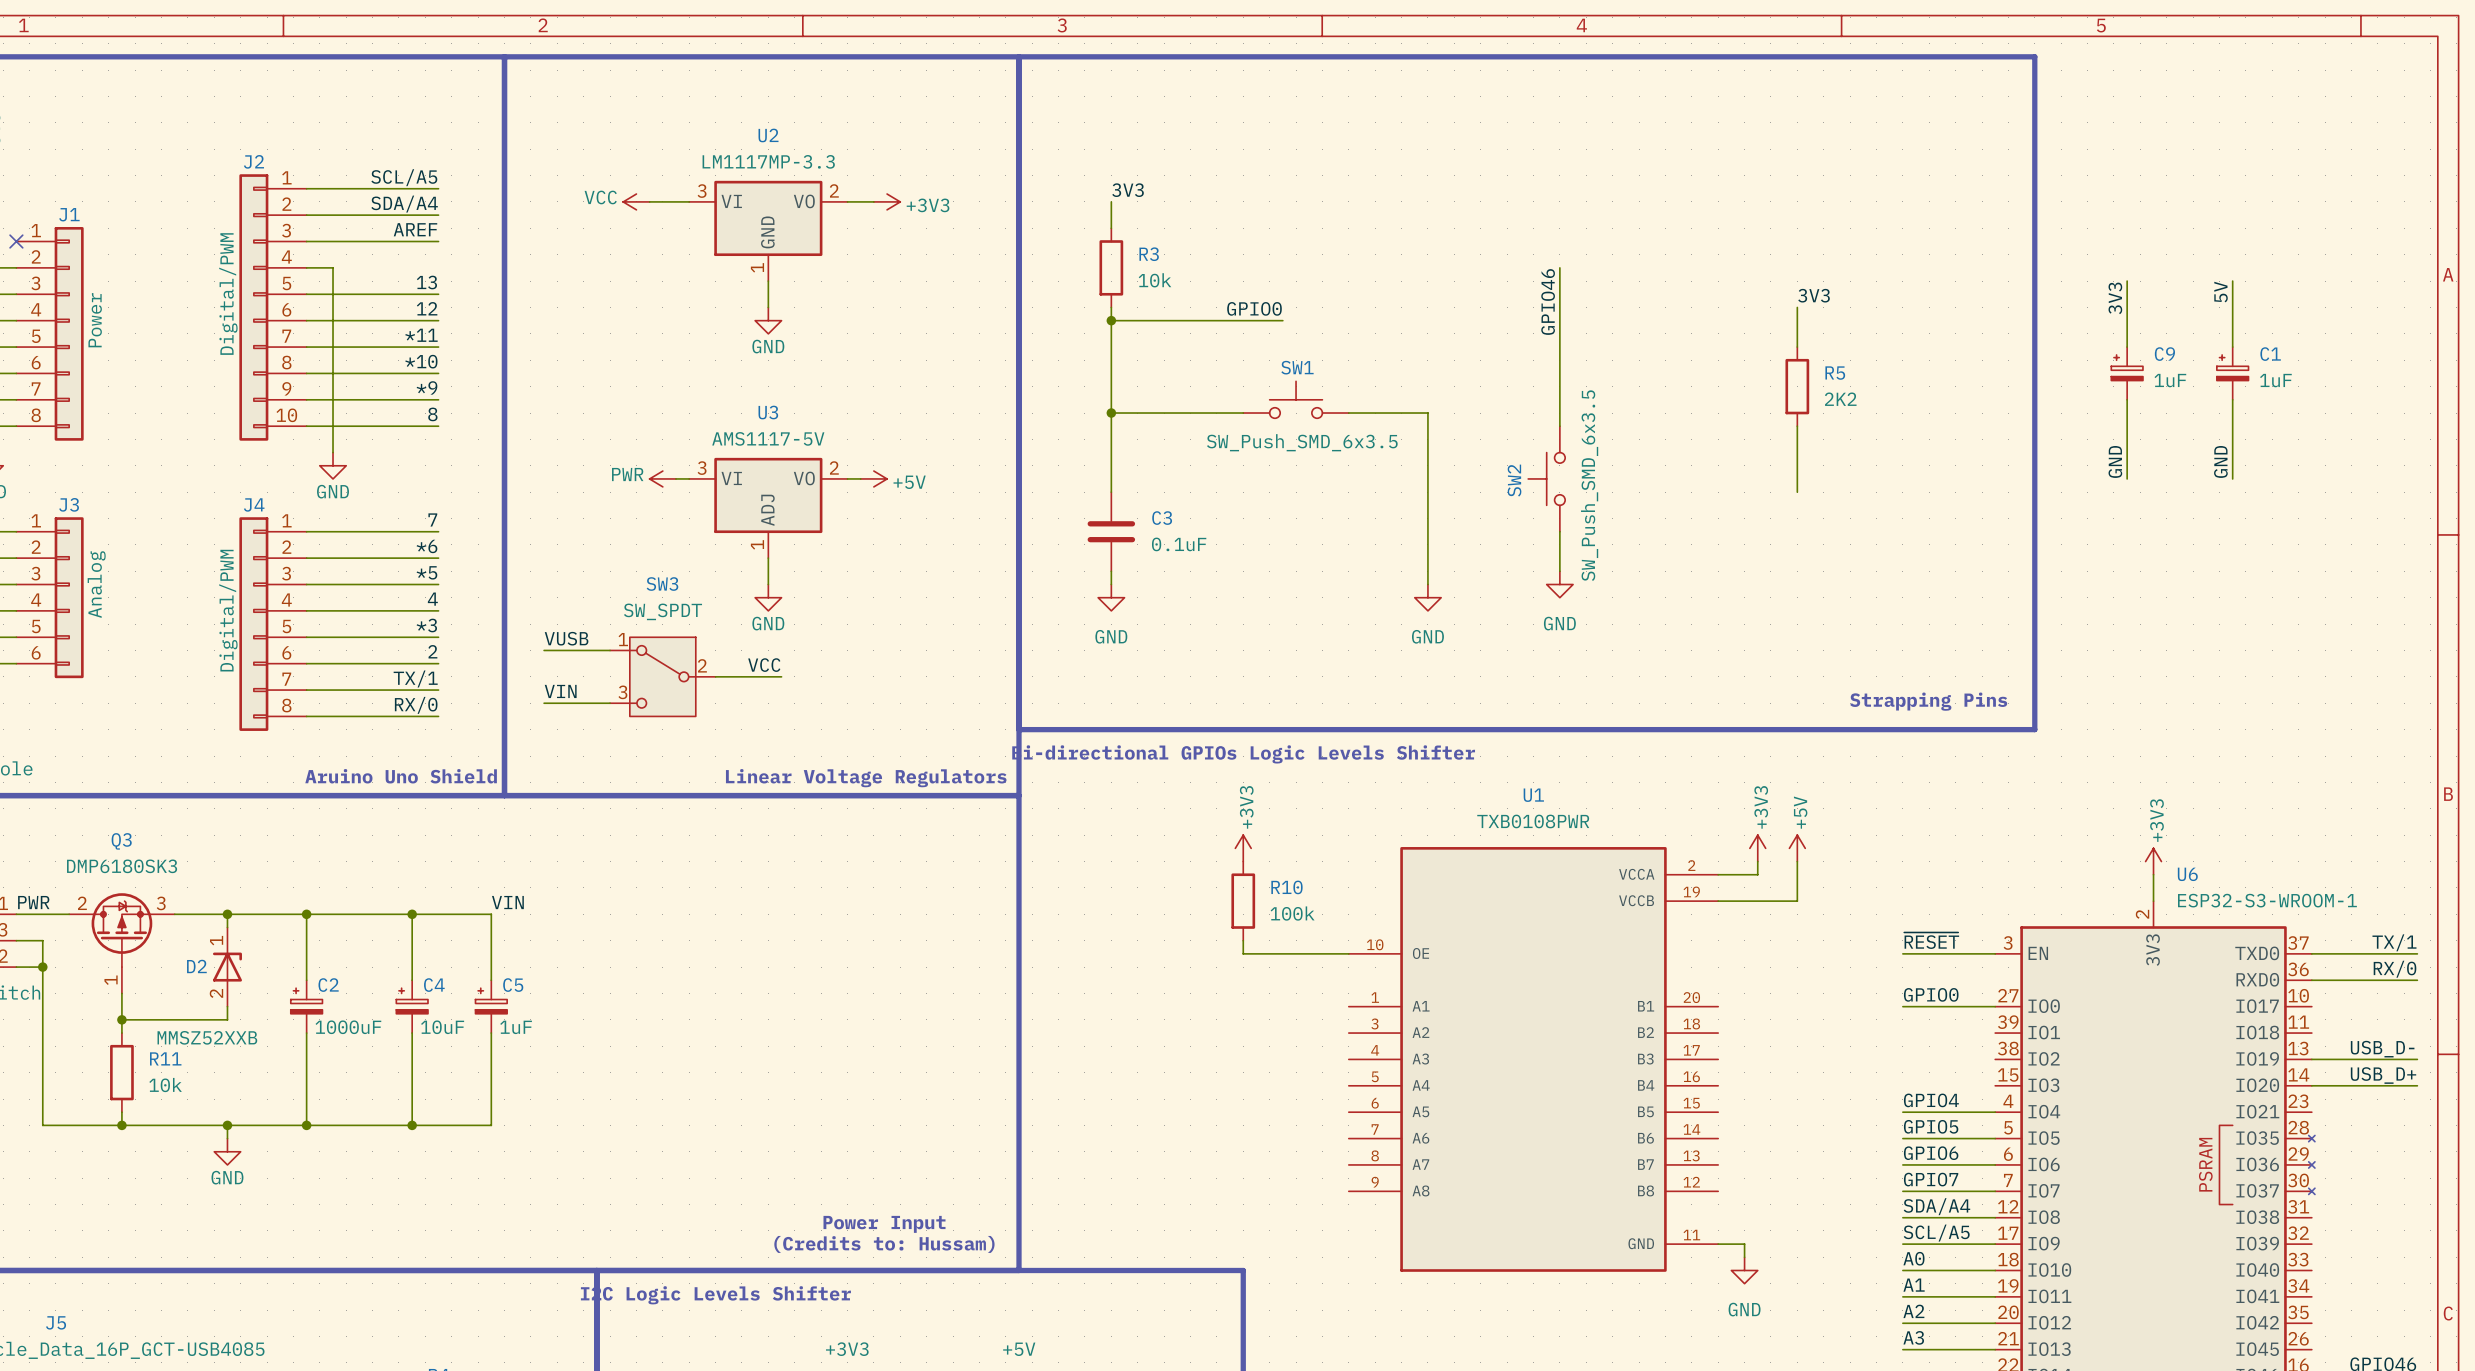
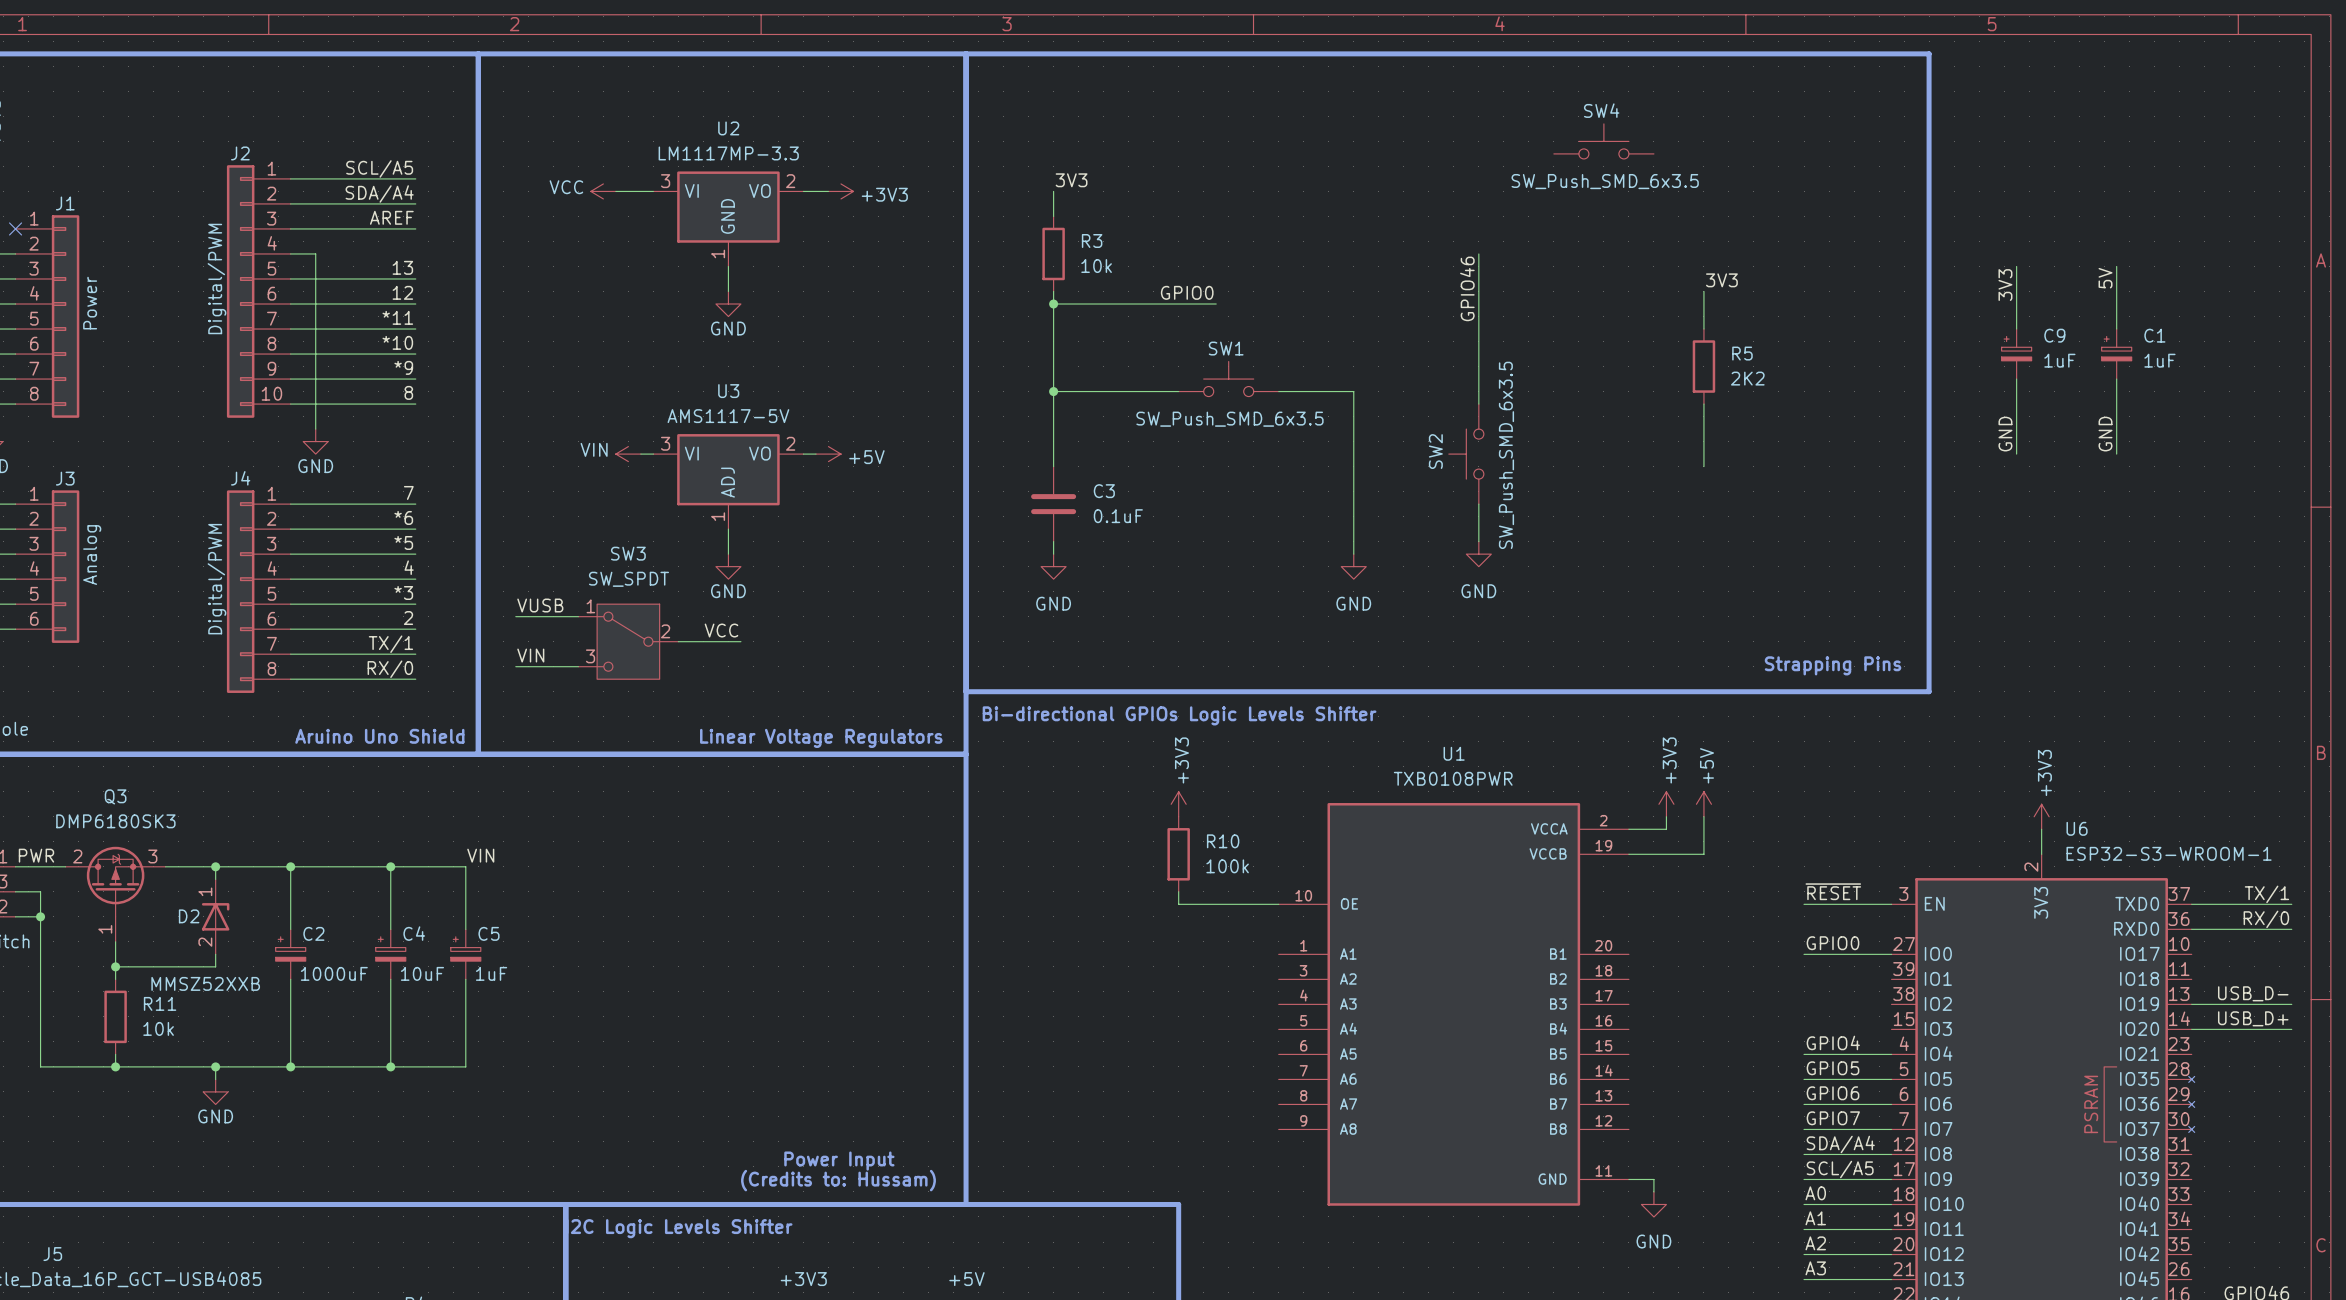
SW4: none -> SW_Push_SMD_6x3.5 (1603, 141)
power symbol: PWR (662, 478) -> VIN (628, 454)

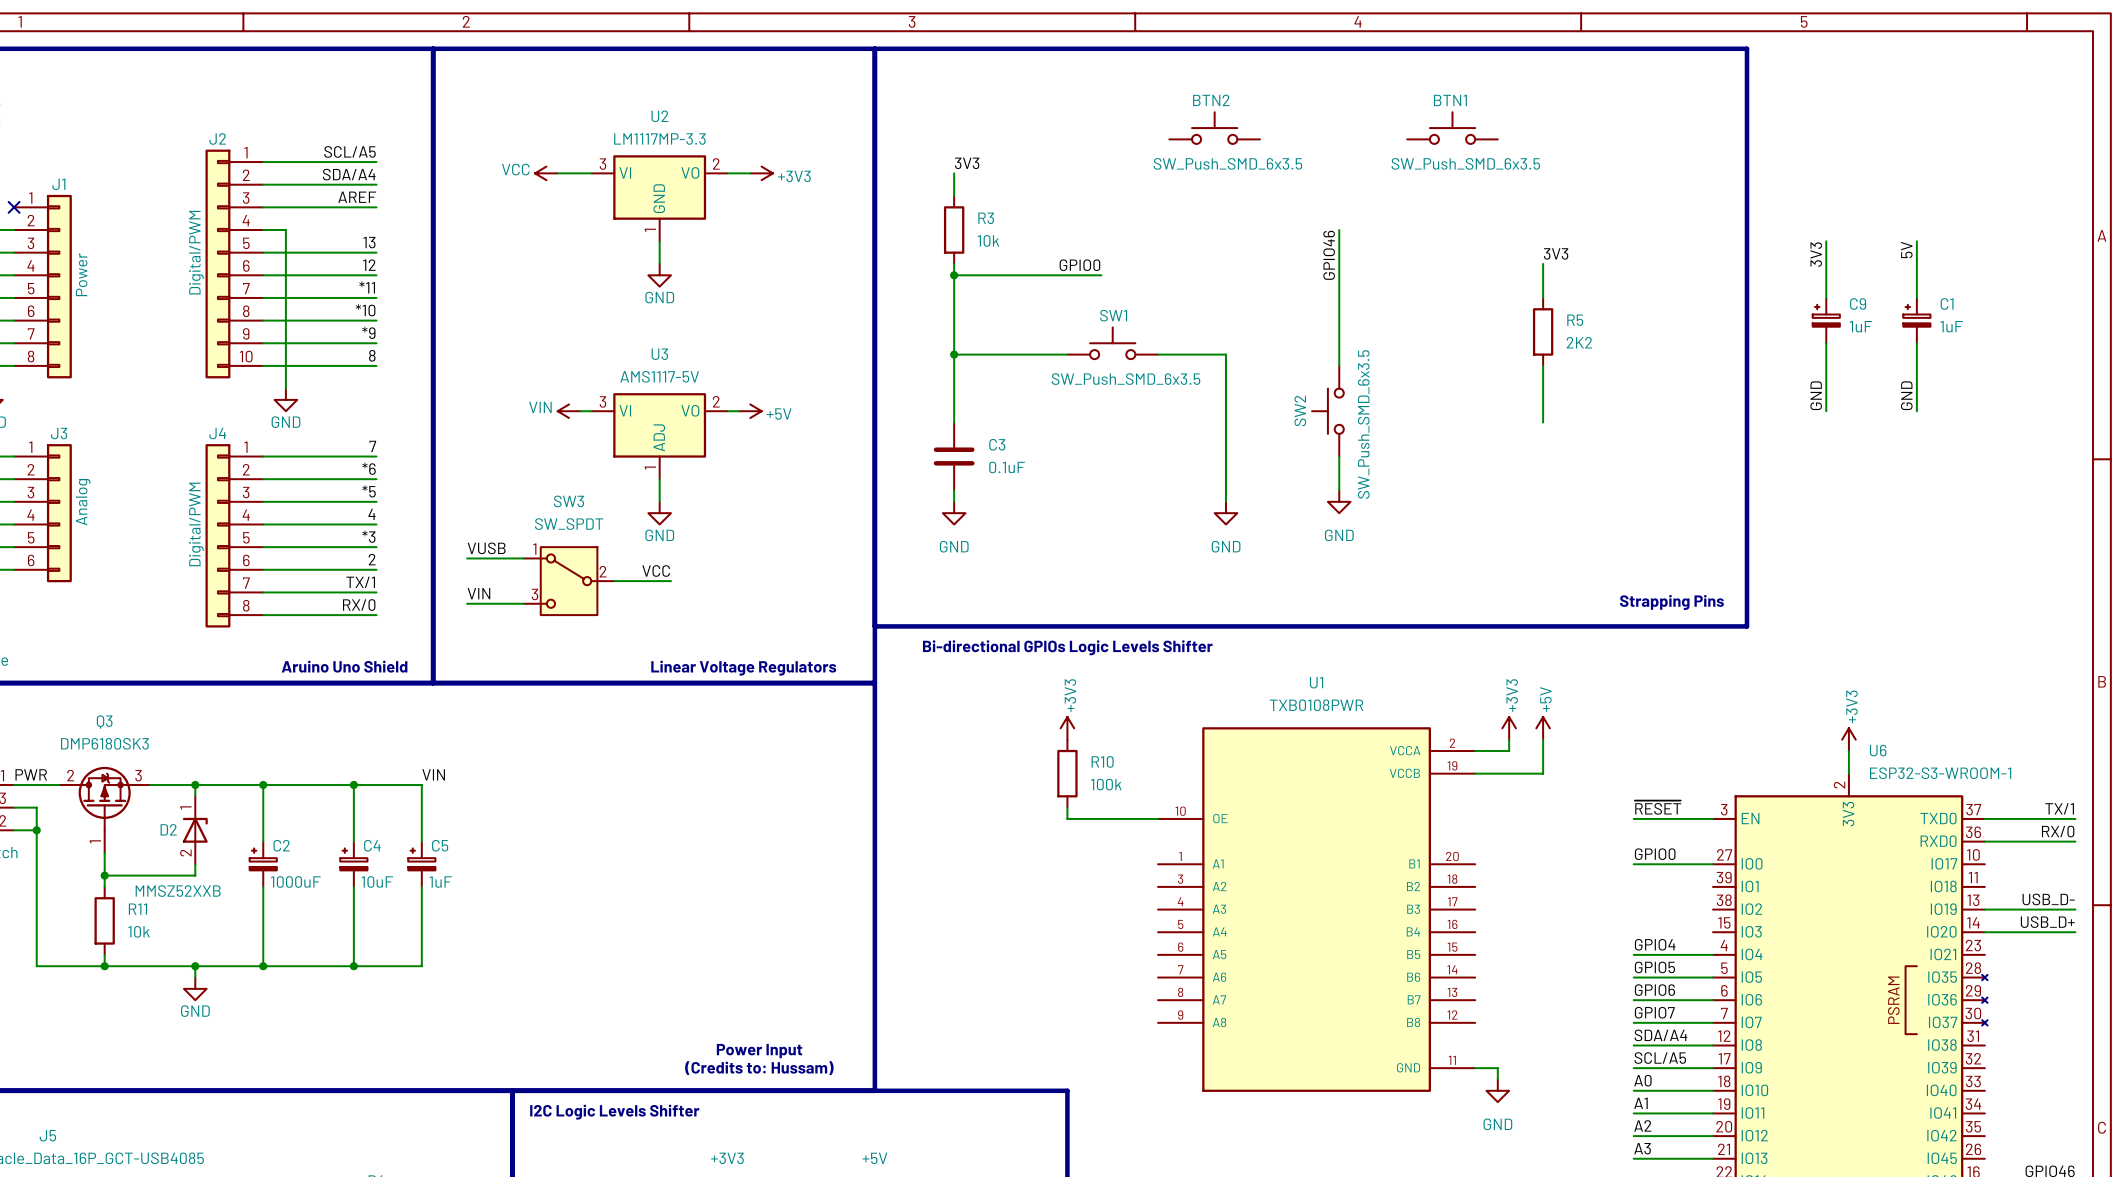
SW4 name: SW4 (1601, 110) -> BTN1 (1450, 100)
BTN2: none -> SW_Push_SMD_6x3.5 (1214, 128)

